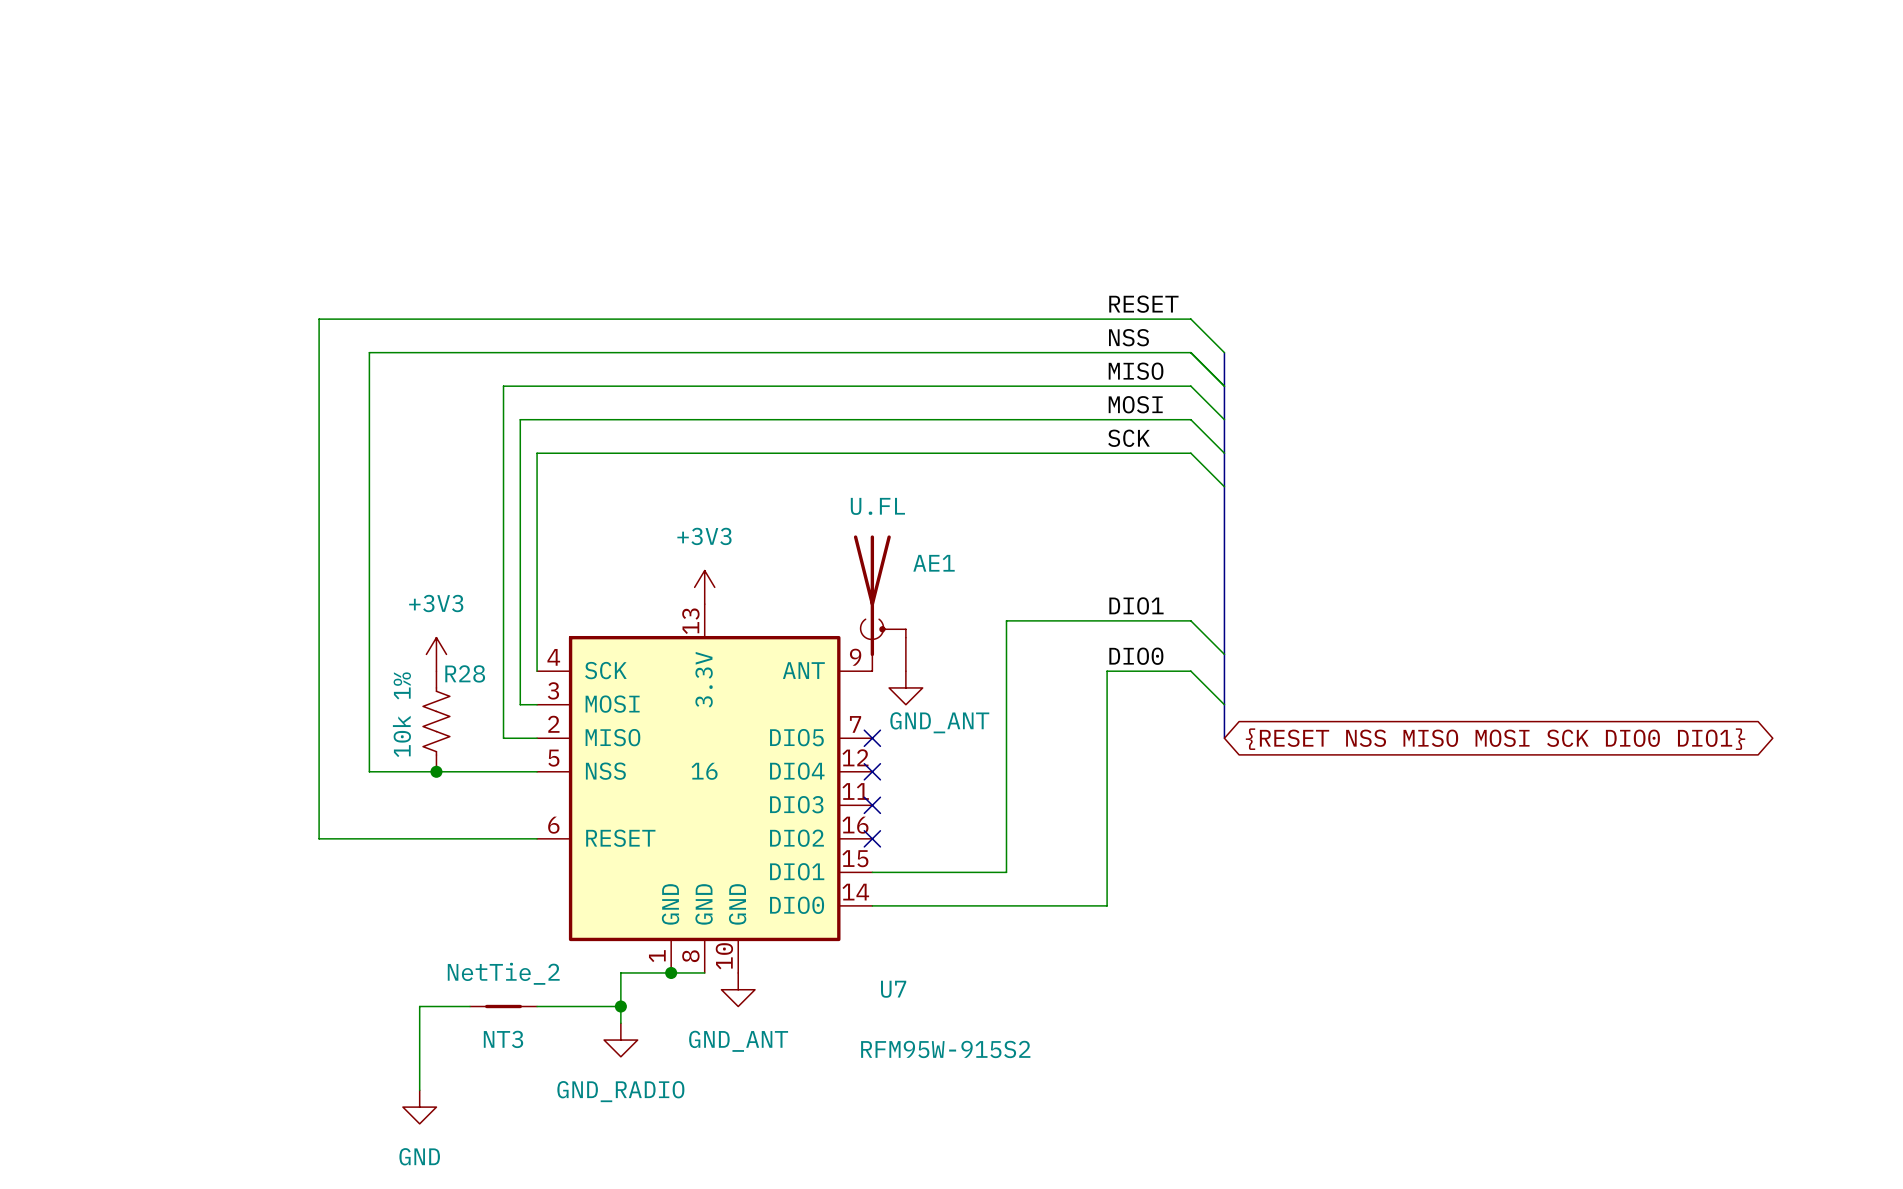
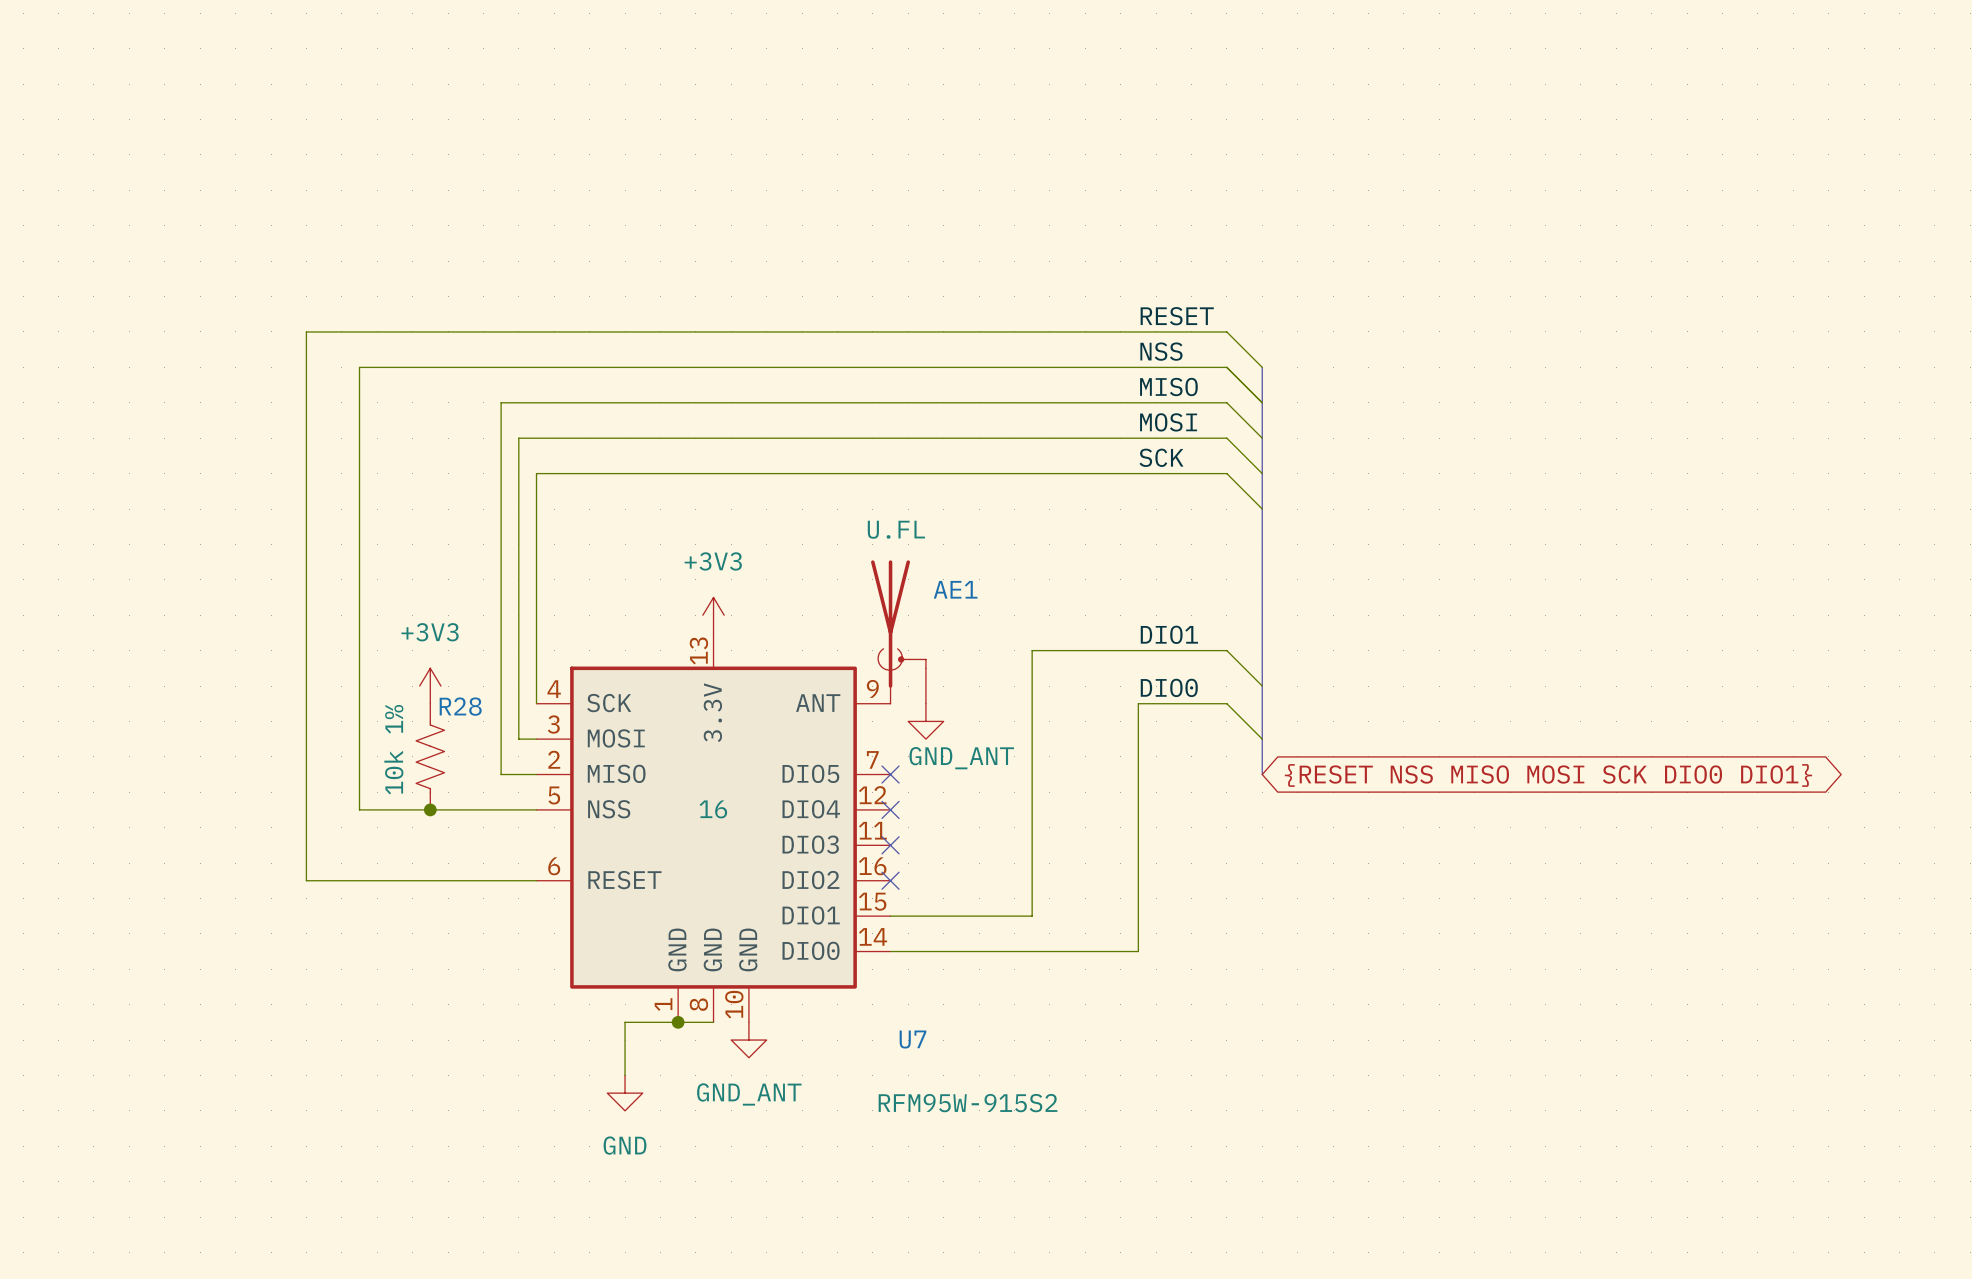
wire: (469, 1006) (419, 1006) (419, 1090) -> none
NT3: NetTie_2 (503, 1006) -> none
wire: (537, 1006) (620, 1006) -> none
junction: (620, 1006) -> none
power symbol: GND_RADIO (620, 1040) -> GND (625, 1093)
power symbol: GND (419, 1107) -> none

